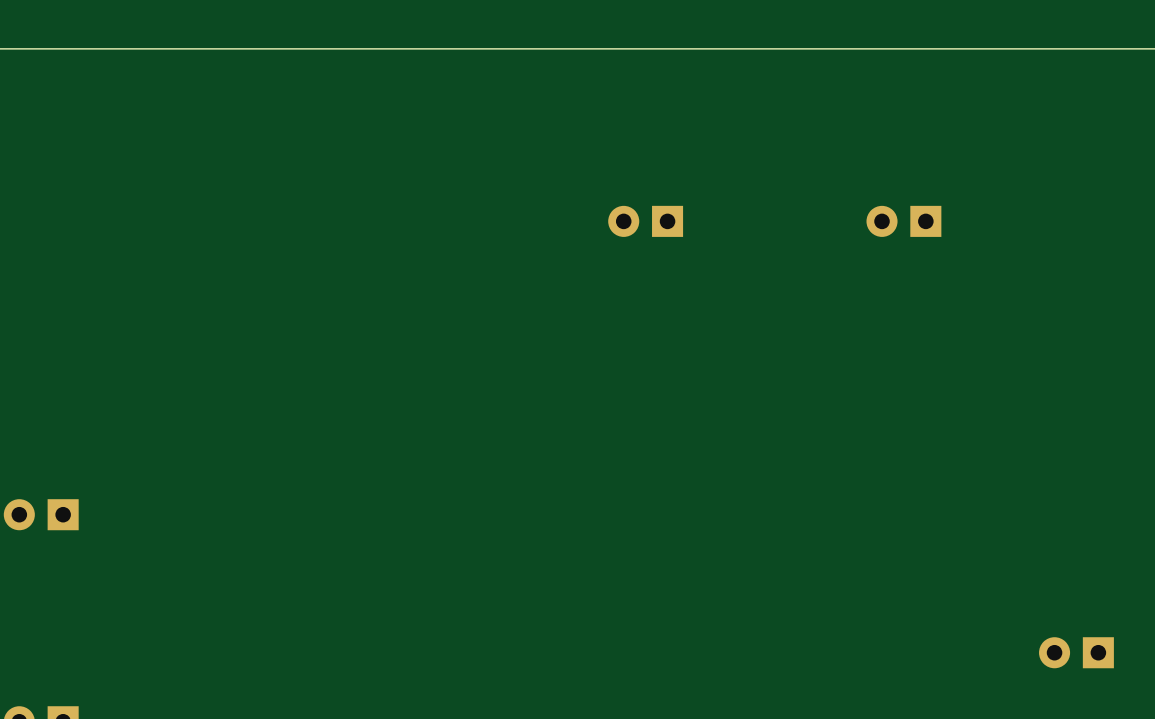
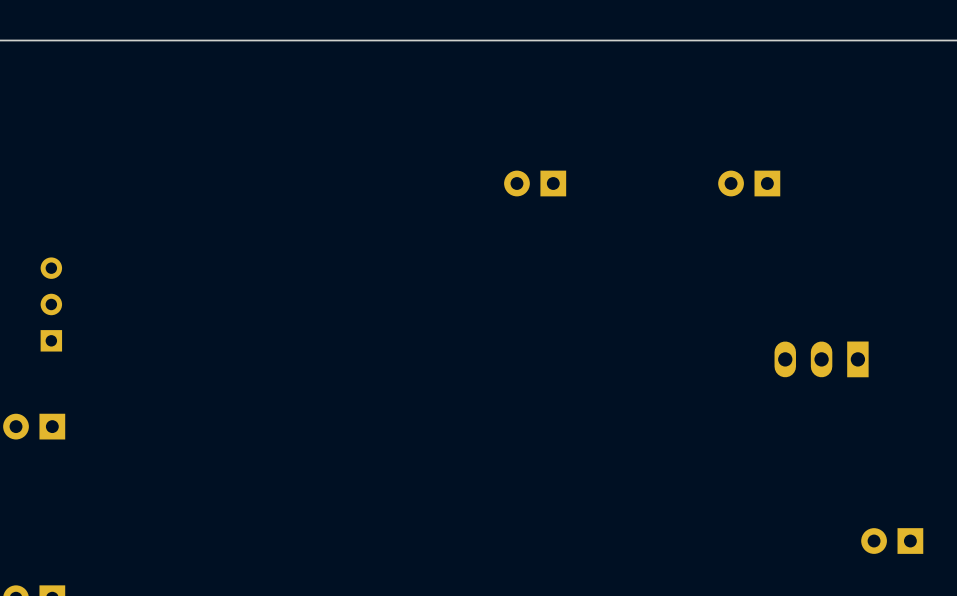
part: none -> (51, 304)
part: none -> (821, 359)

